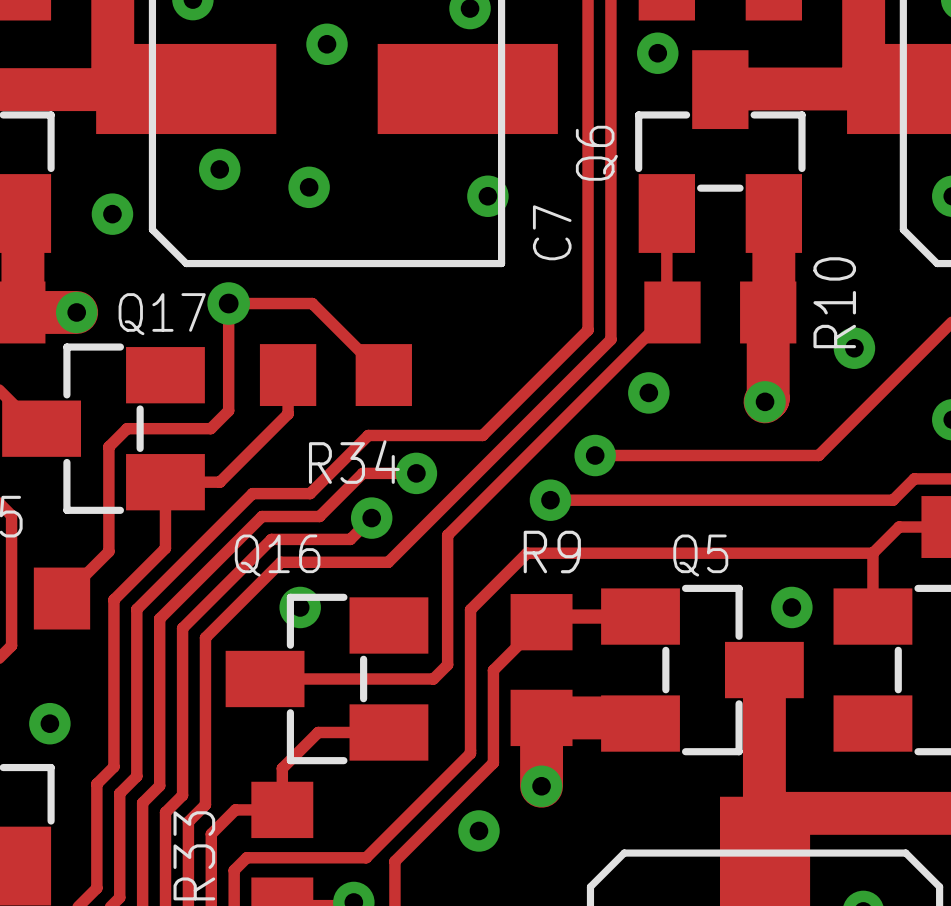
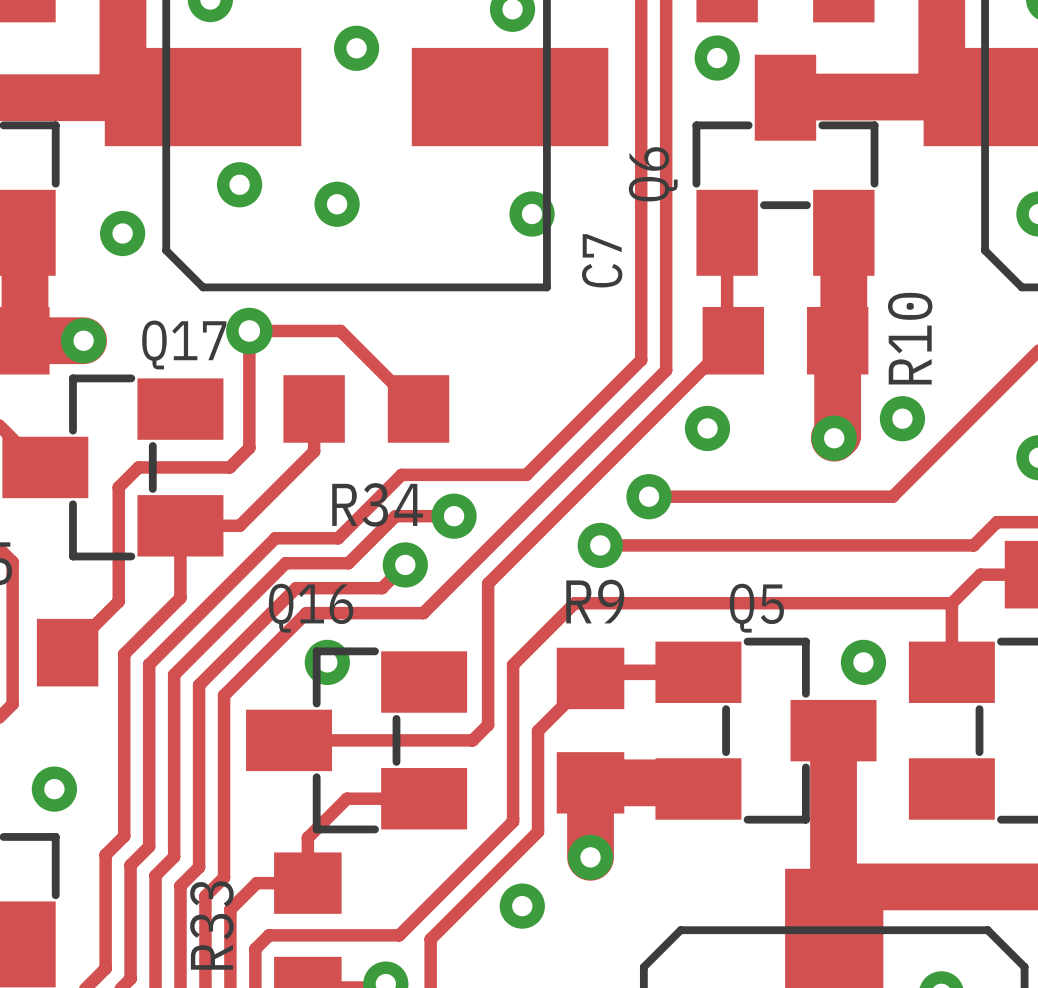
via position: (854, 348) -> (902, 418)

